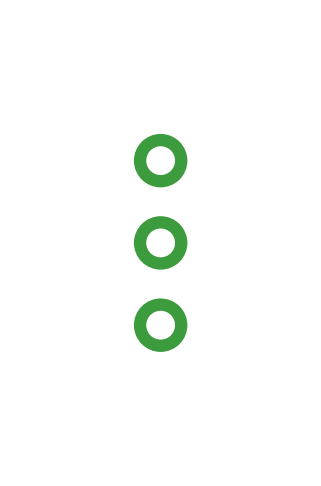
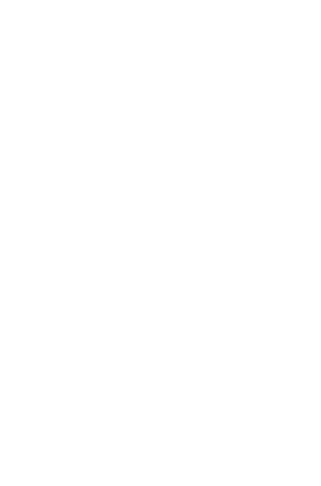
part: (160, 242) -> none

